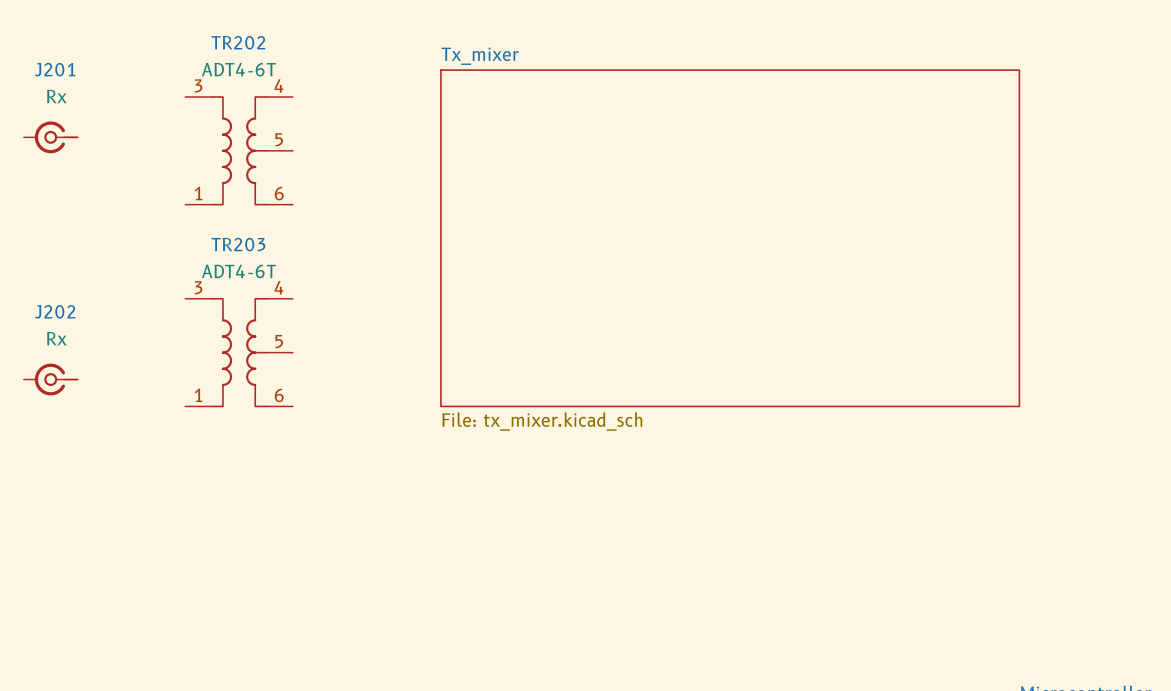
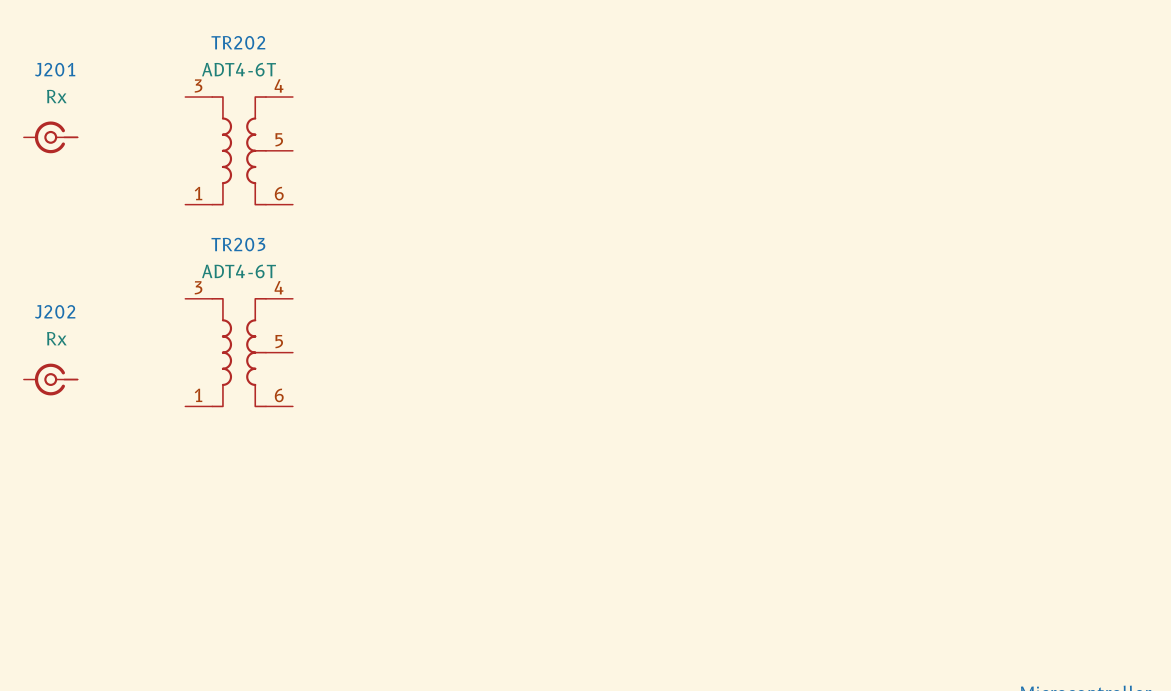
sheet Tx_mixer: File: tx_mixer.kicad_sch (730, 238) -> none

